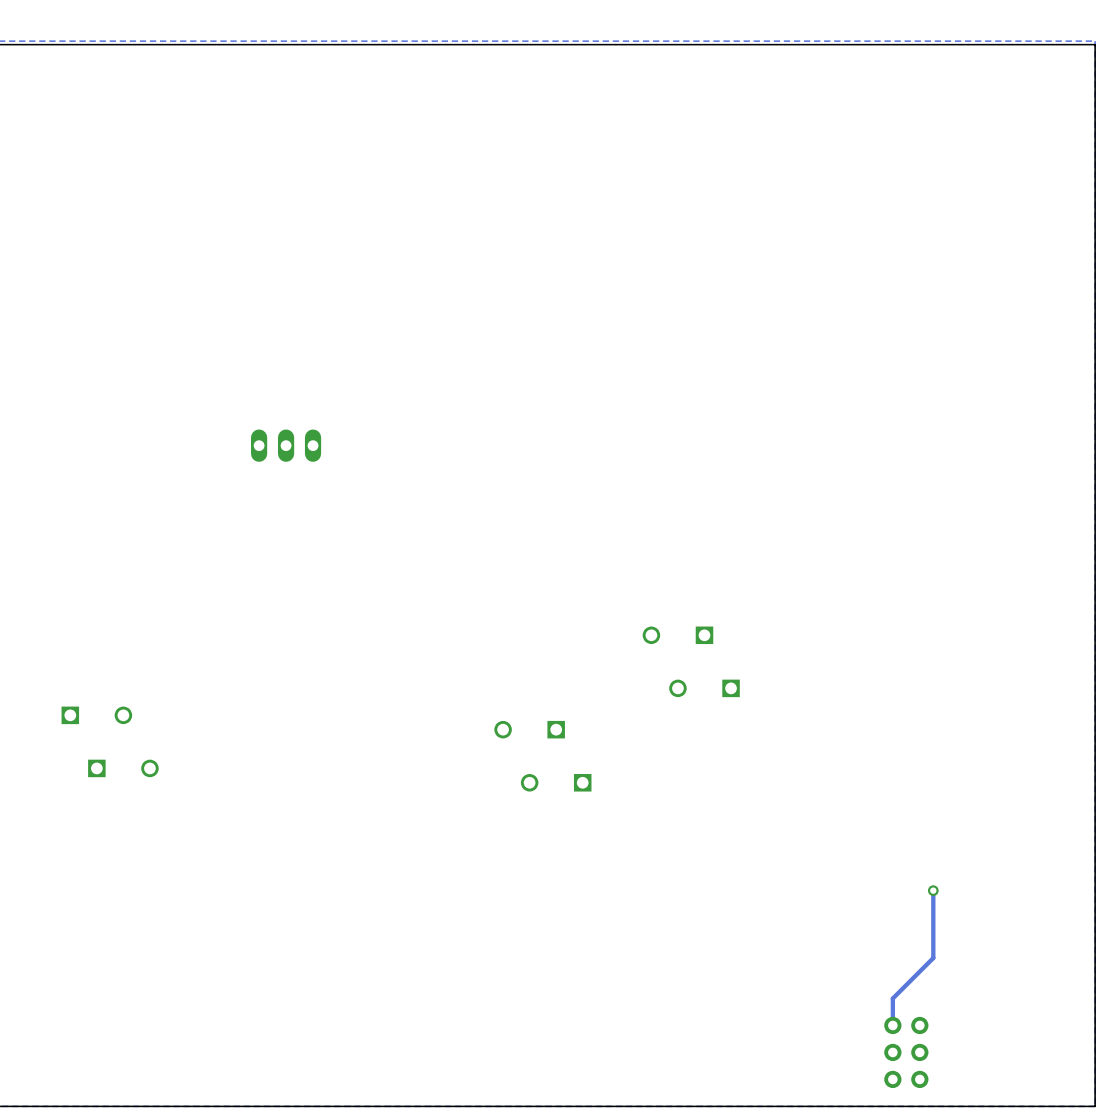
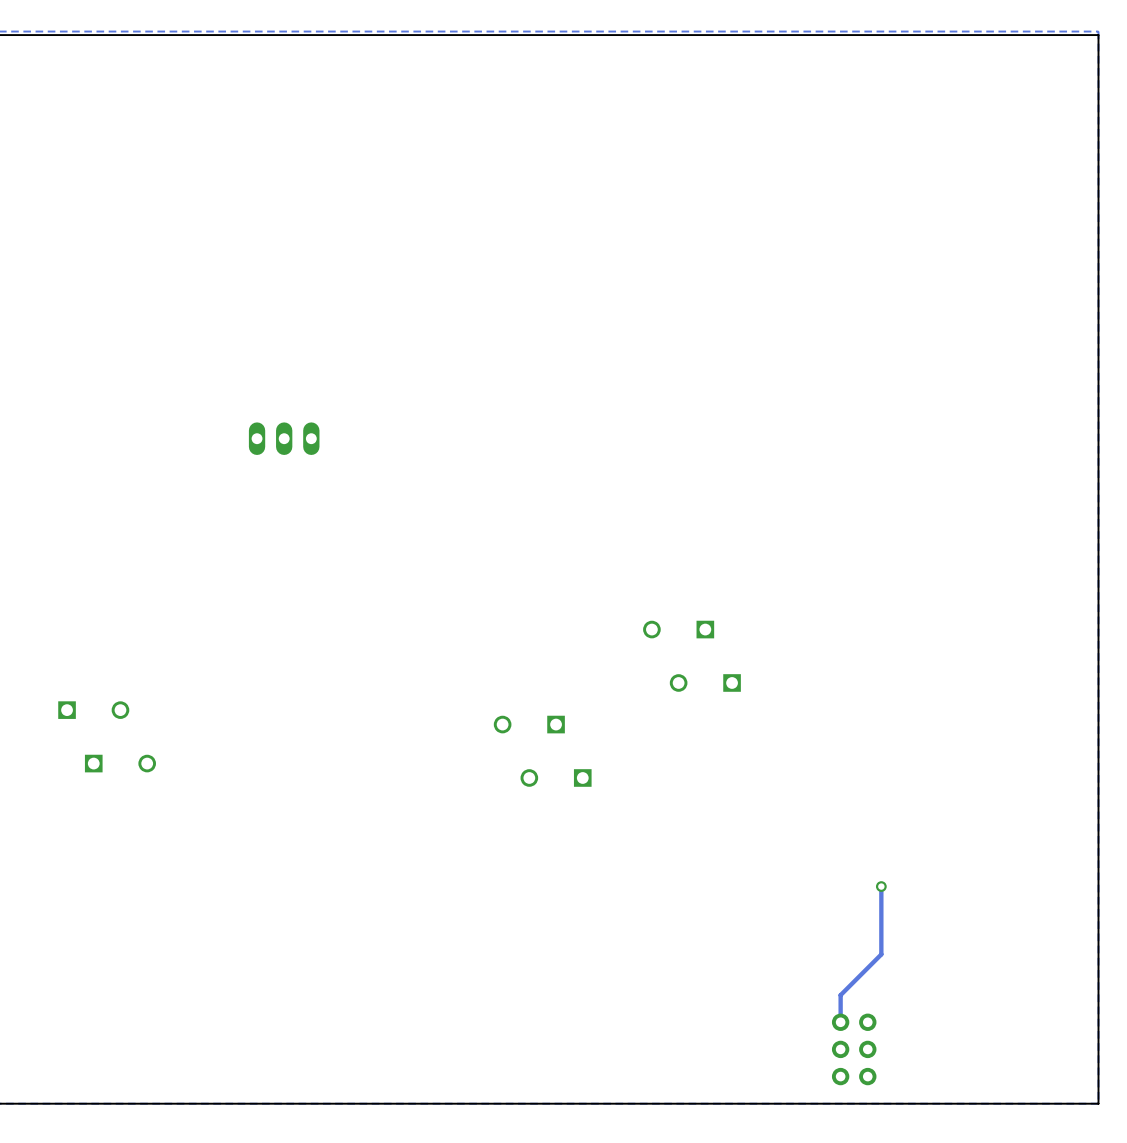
track: (933, 890) (933, 958) (892, 998) (892, 1025) -> (881, 886) (881, 954) (840, 995) (840, 1022)
via position: (933, 890) -> (881, 886)
part position: (906, 1052) -> (854, 1049)

